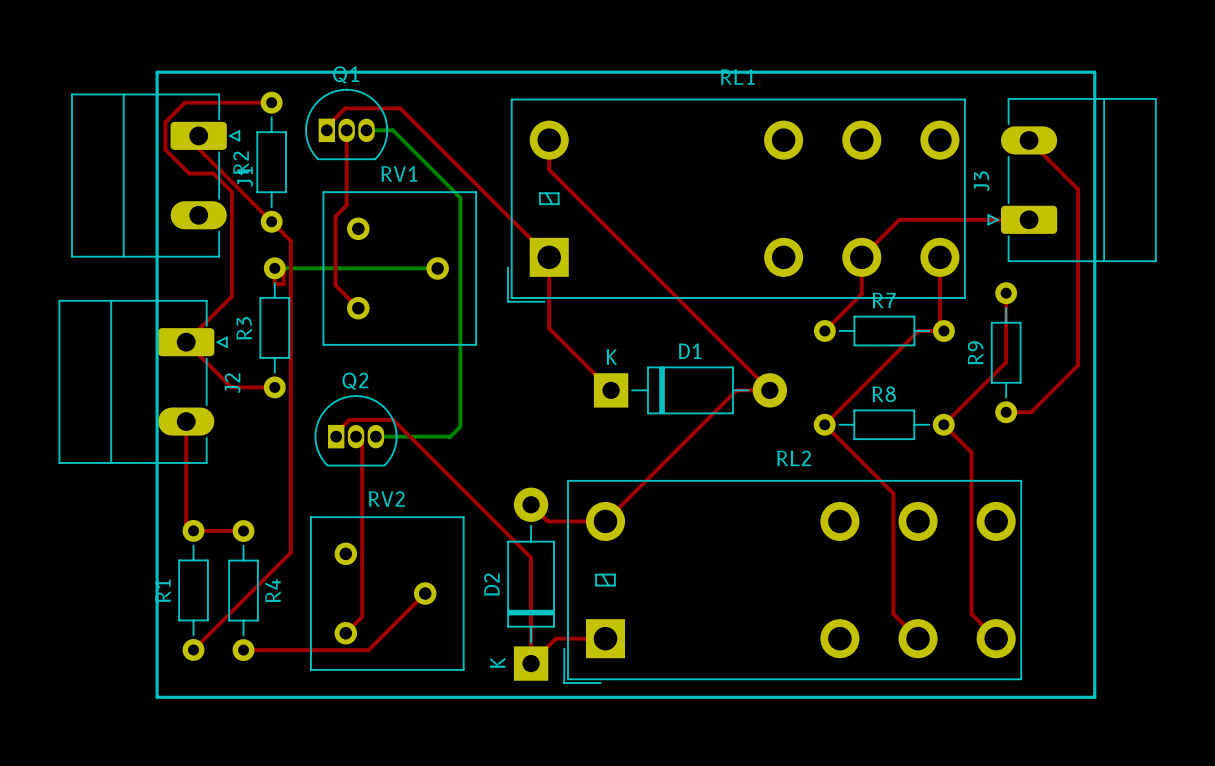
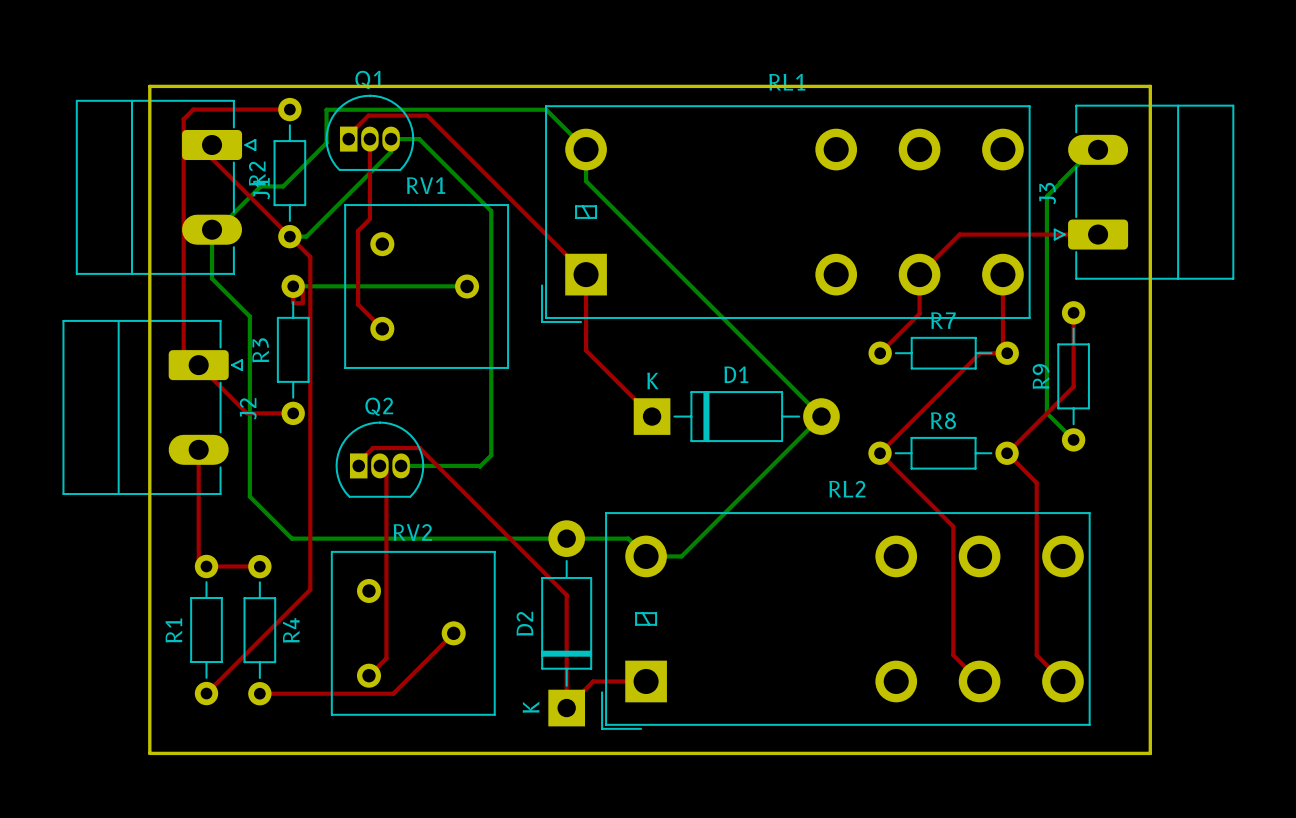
line: (157, 72) (1094, 72) (1094, 697) (157, 697) (157, 72) -> none
board edge: none -> (149, 86) (1150, 86) (1150, 753) (149, 753) (149, 86)
top track: (184, 102) (165, 122) (165, 149) (189, 173) (213, 173) (231, 191) (231, 296) (186, 342) -> (197, 109) (193, 109) (183, 119) (183, 350) (198, 365)
bottom track: none -> (391, 139) (391, 151) (306, 236) (289, 236)
bottom track: none -> (1098, 144) (1046, 196) (1046, 413) (1073, 439)
top track: (549, 140) (549, 169) (769, 390) (736, 390) (605, 521) (547, 521) (531, 504) -> none
top track: (1029, 140) (1078, 189) (1078, 365) (1031, 412) (1006, 412) -> none
bottom track: none -> (212, 229) (212, 278) (249, 316) (249, 496) (291, 538) (628, 538) (646, 556) (681, 556) (821, 416) (586, 181) (586, 149) (546, 109) (326, 109) (326, 143) (283, 186) (260, 186) (212, 235)

